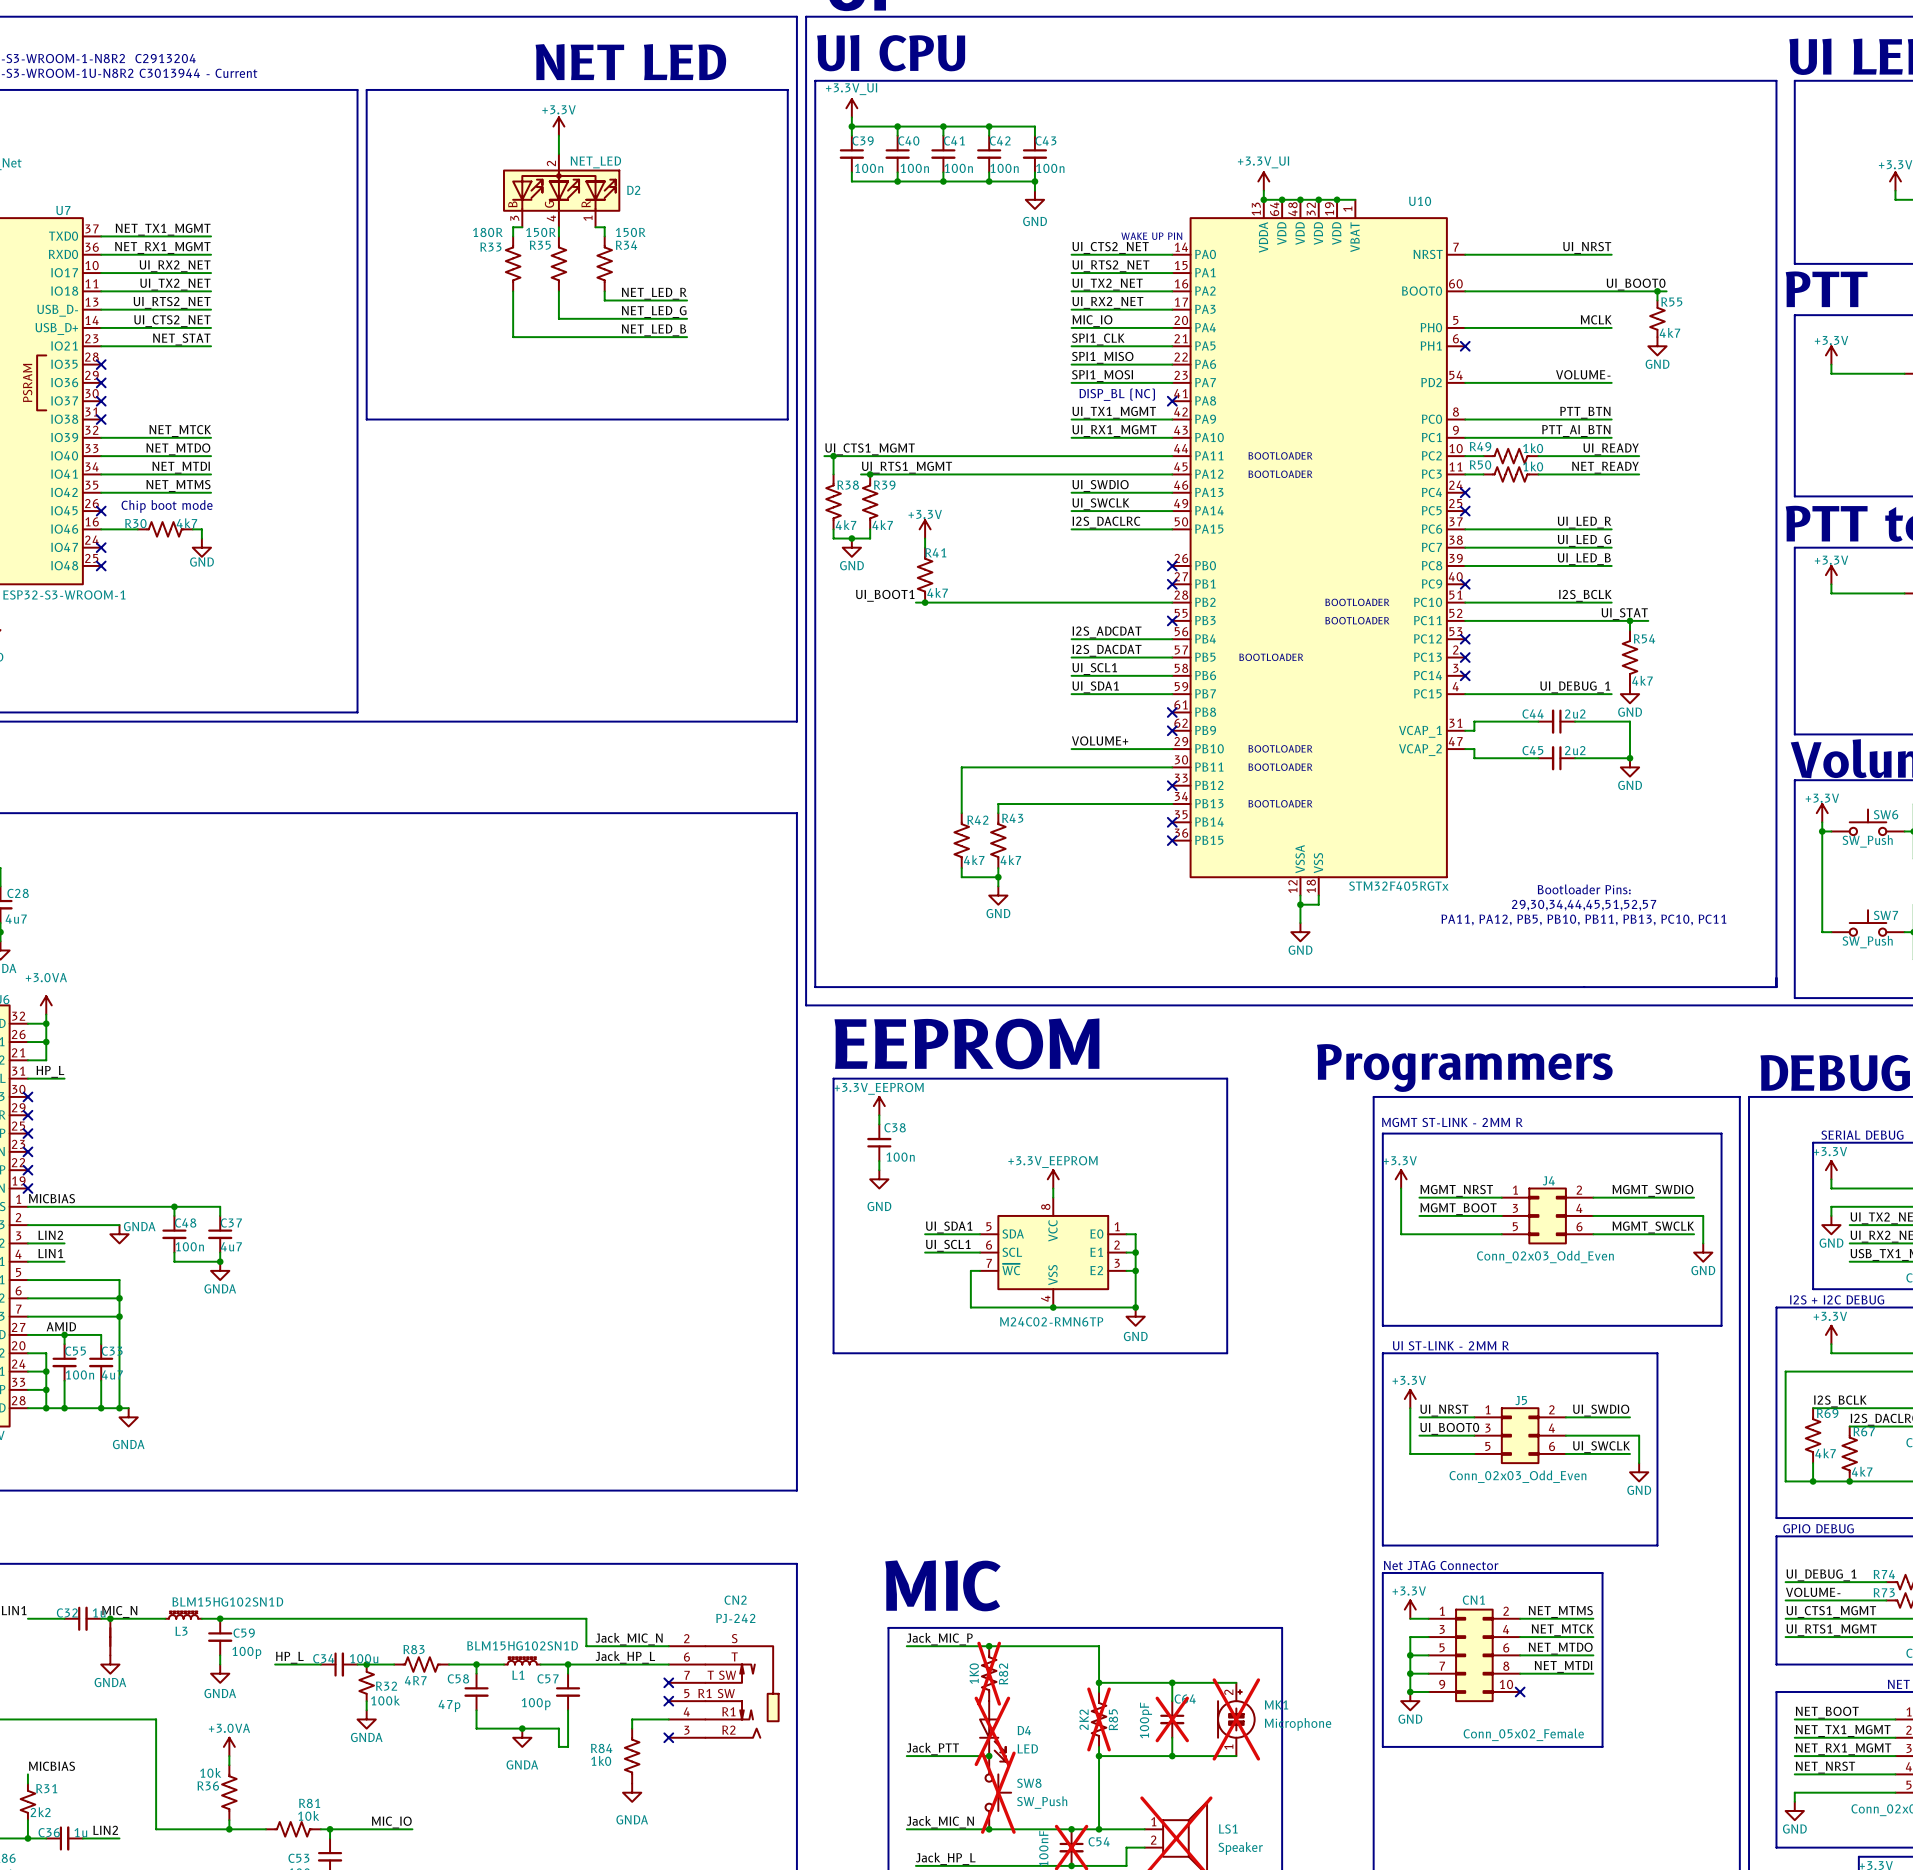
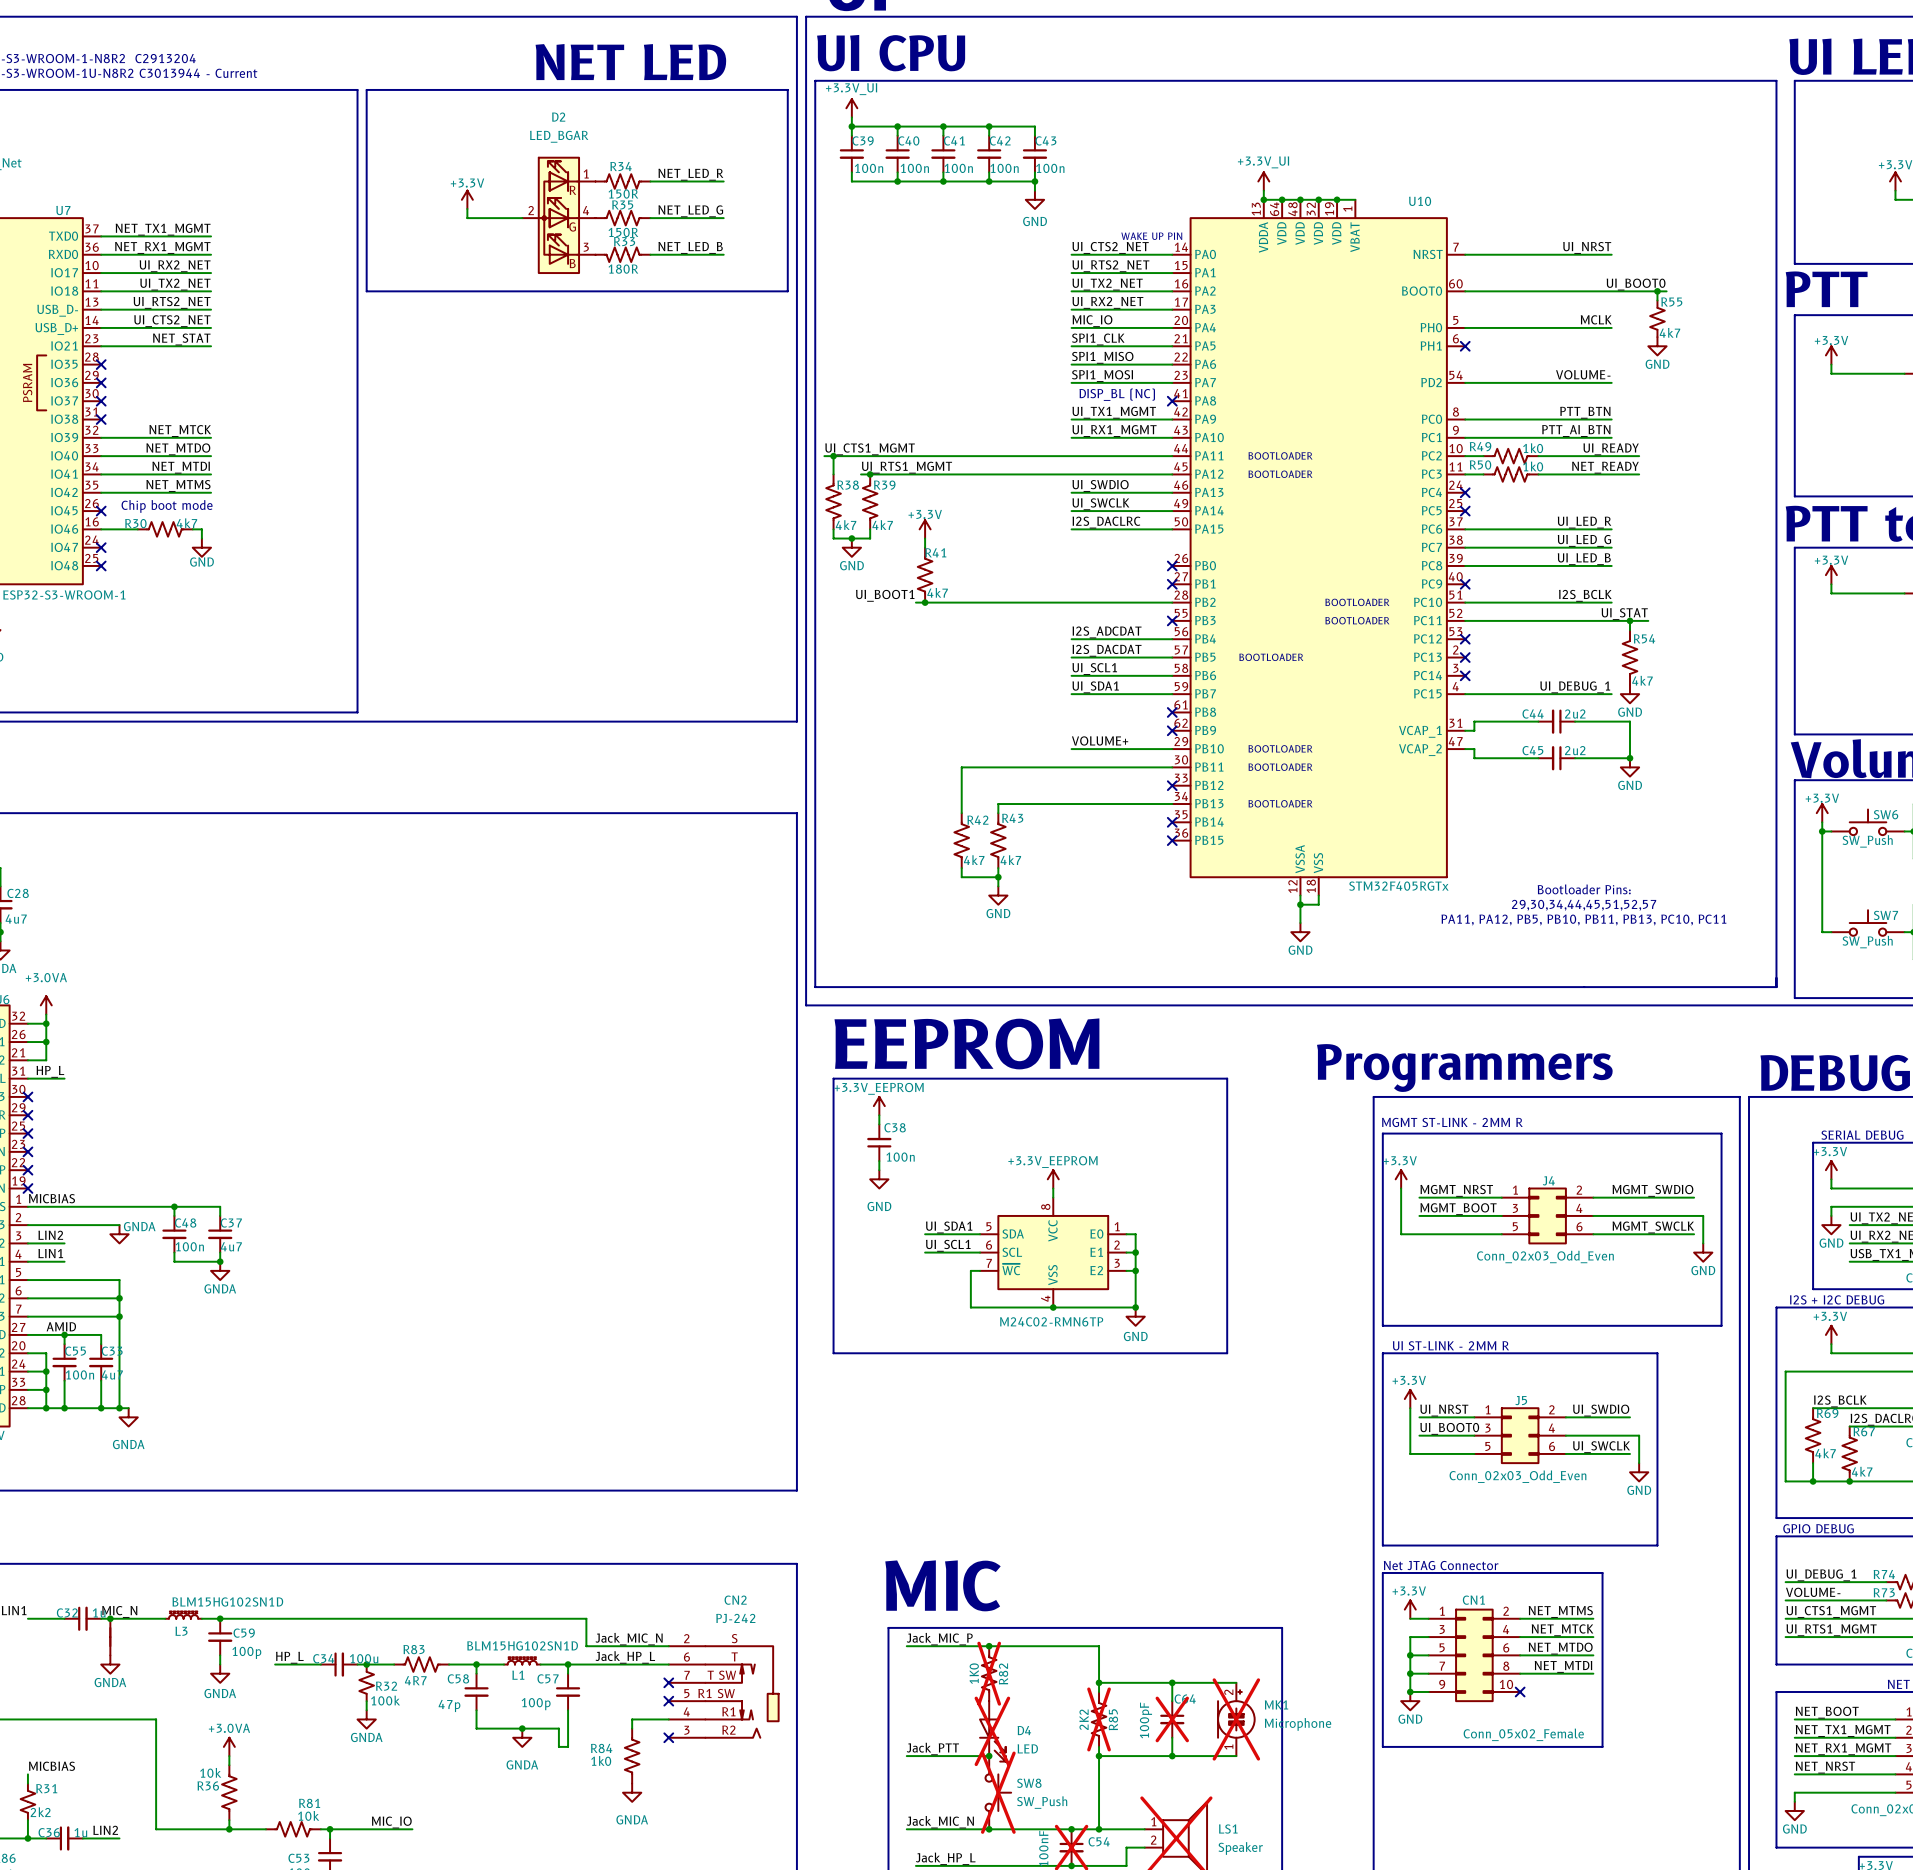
power symbol position: +3.3V (558, 126) -> +3.3V (467, 199)
wire: (558, 135) (558, 154) -> none
D2 value: NET_LED (595, 162) -> LED_BGAR (559, 136)
wire: none -> (650, 181) (723, 181)
D2 rotation: 0° (561, 190) -> 90° counterclockwise (558, 215)
D2 name position: D2 (633, 190) -> D2 (558, 117)
wire: none -> (467, 208) (467, 218) (522, 218)
wire: none -> (650, 218) (723, 218)
wire: (522, 227) (513, 227) (513, 236) -> none
wire: (595, 227) (604, 227) (604, 236) -> none
R33 value position: 180R (487, 232) -> 180R (623, 269)
R35 value position: 150R (541, 232) -> 150R (623, 232)
R34 value position: 150R (630, 232) -> 150R (623, 194)
R35 name position: R35 (540, 245) -> R35 (622, 204)
R34 name position: R34 (626, 245) -> R34 (621, 166)
R33 name position: R33 (490, 247) -> R33 (624, 241)
wire: none -> (650, 254) (723, 254)
R33 rotation: 0° (513, 263) -> 90° clockwise (623, 254)
R33 position: (513, 263) -> (623, 254)
R35 rotation: 0° (558, 263) -> 90° clockwise (623, 218)
R35 position: (558, 263) -> (623, 218)
R34 rotation: 0° (604, 263) -> 90° clockwise (623, 181)
R34 position: (604, 263) -> (623, 181)
line: (366, 291) (366, 419) (787, 419) (787, 291) -> (366, 291) (787, 291)
wire: (513, 291) (513, 337) (687, 337) -> none
wire: (558, 291) (558, 318) (687, 318) -> none
wire: (604, 291) (604, 300) (687, 300) -> none
label position: NET_LED_R (654, 293) -> NET_LED_R (690, 174)
label position: NET_LED_G (654, 312) -> NET_LED_G (690, 211)
label position: NET_LED_B (653, 330) -> NET_LED_B (690, 247)

